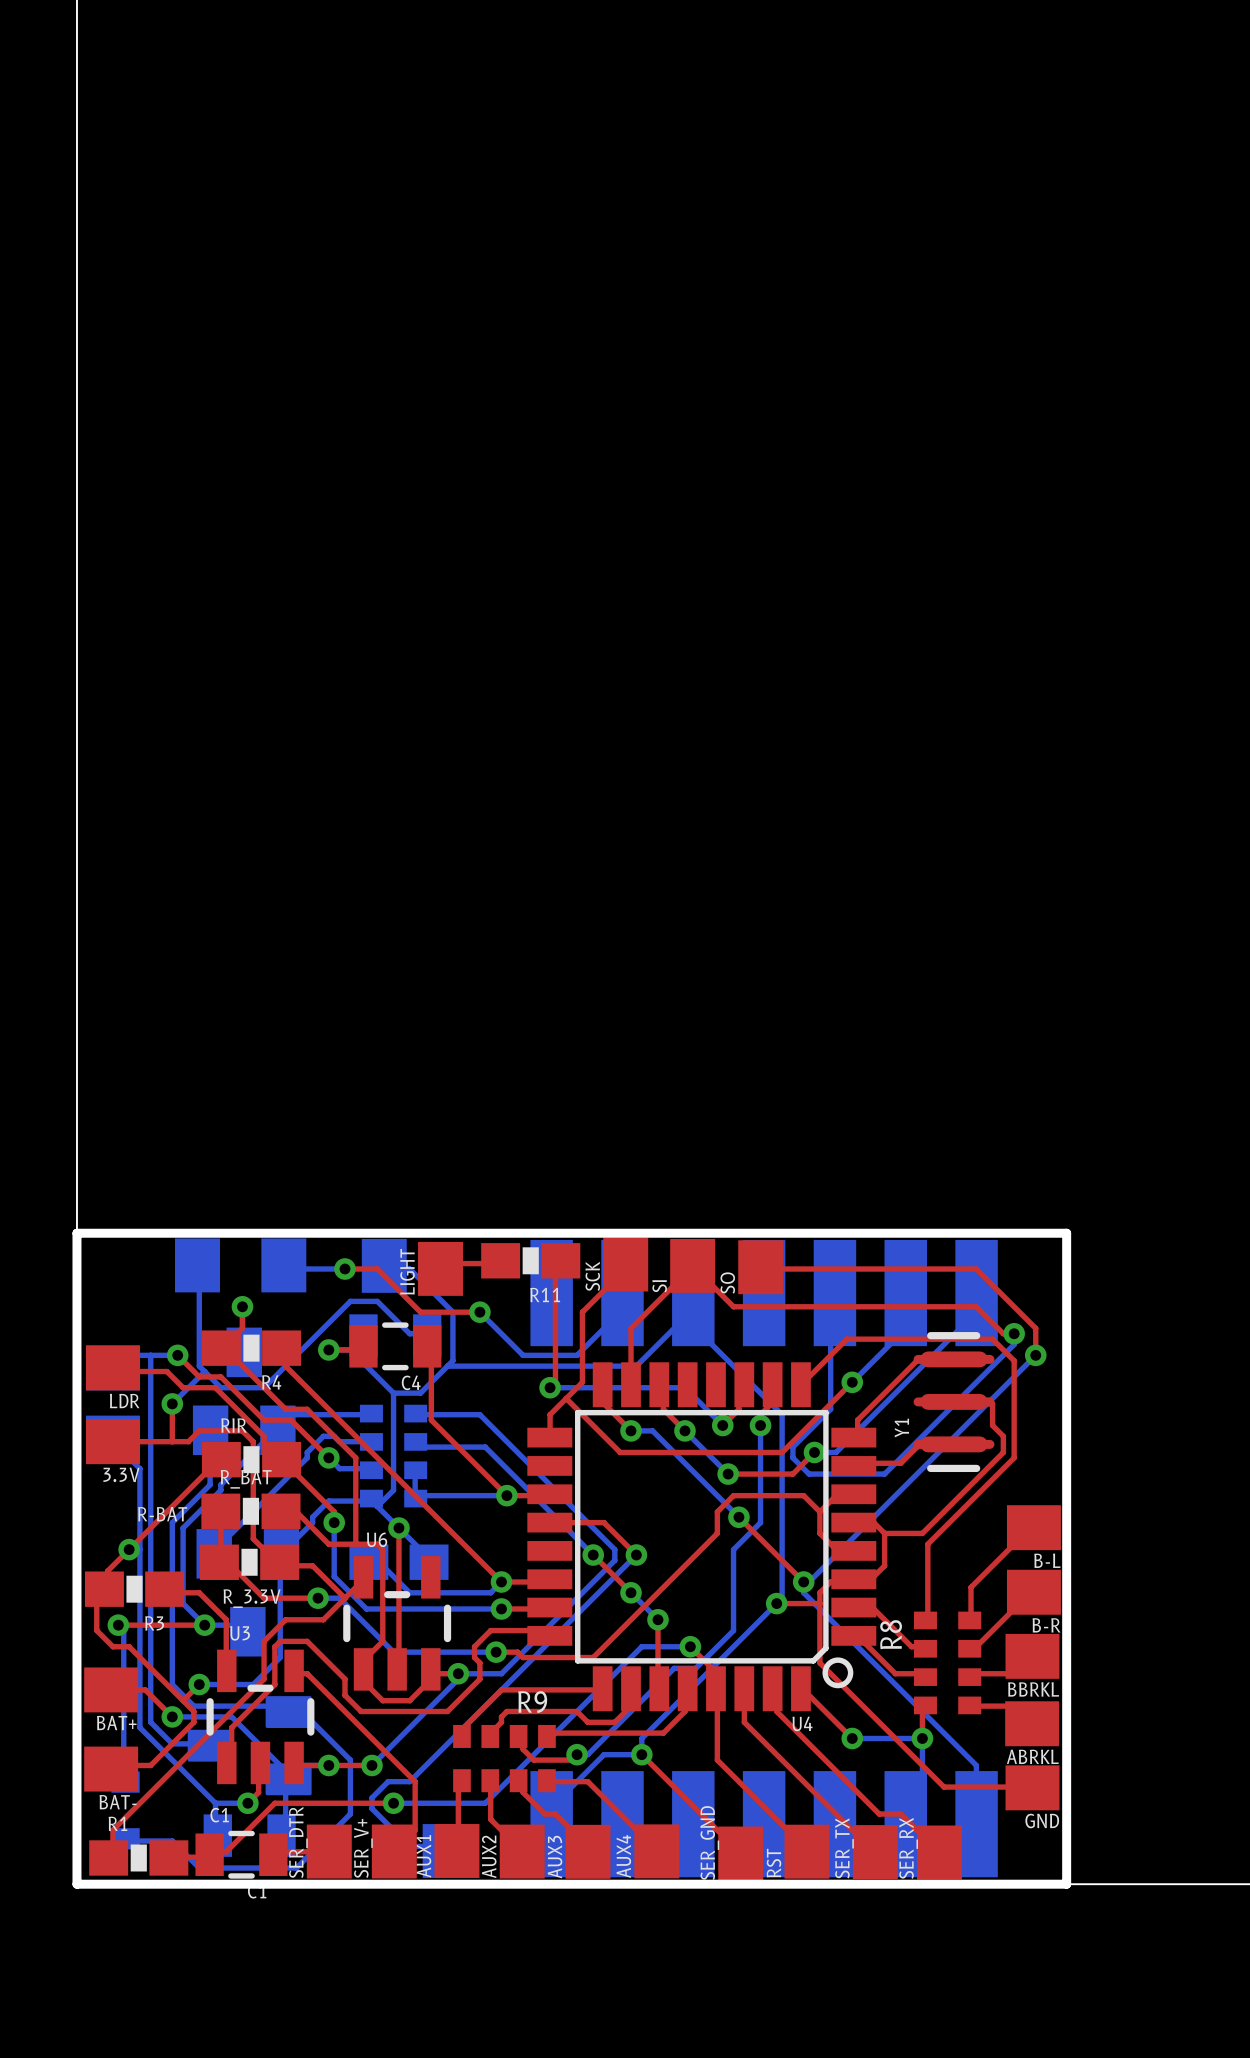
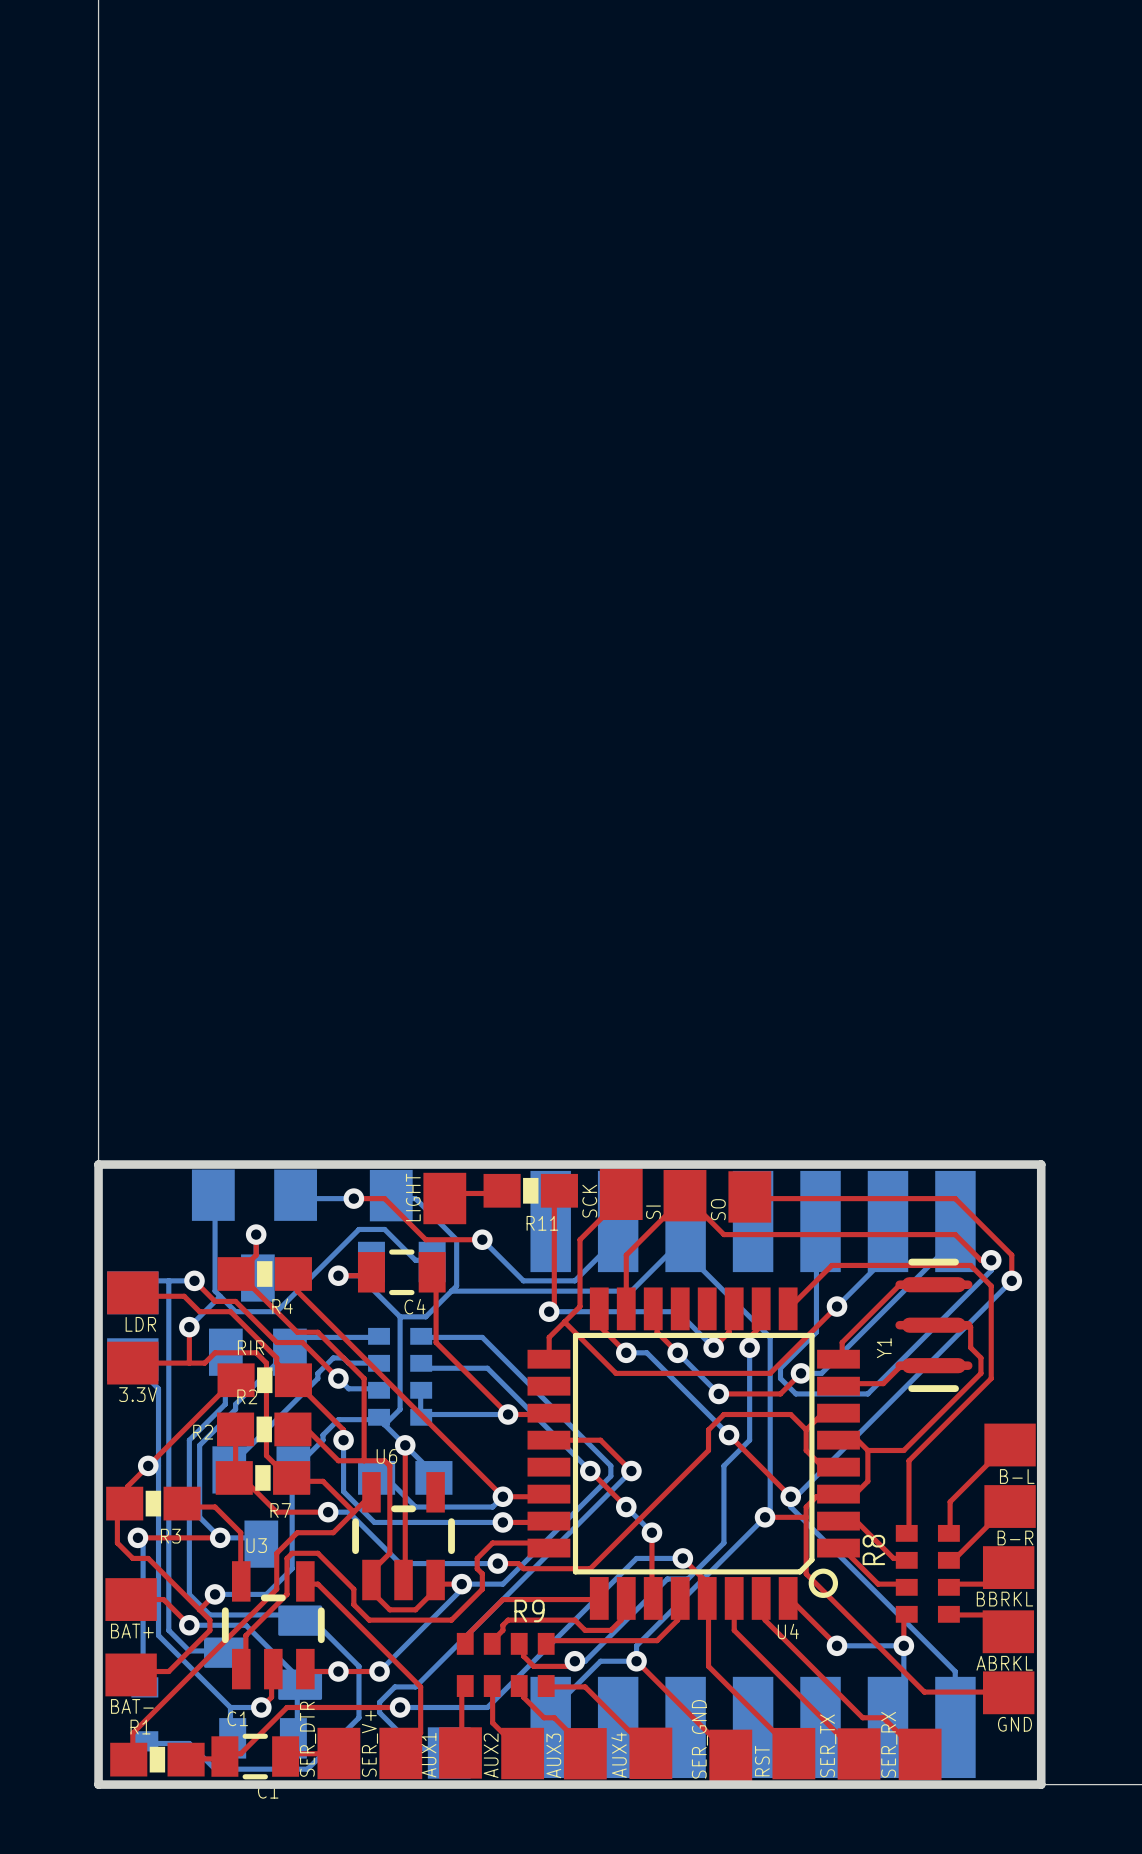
R_BAT name: R_BAT (246, 1479) -> R2 (247, 1396)
text: R-BAT (162, 1514) -> none
text: none -> R2 (203, 1432)
R_3.3V name: R_3.3V (252, 1598) -> R7 (280, 1510)

